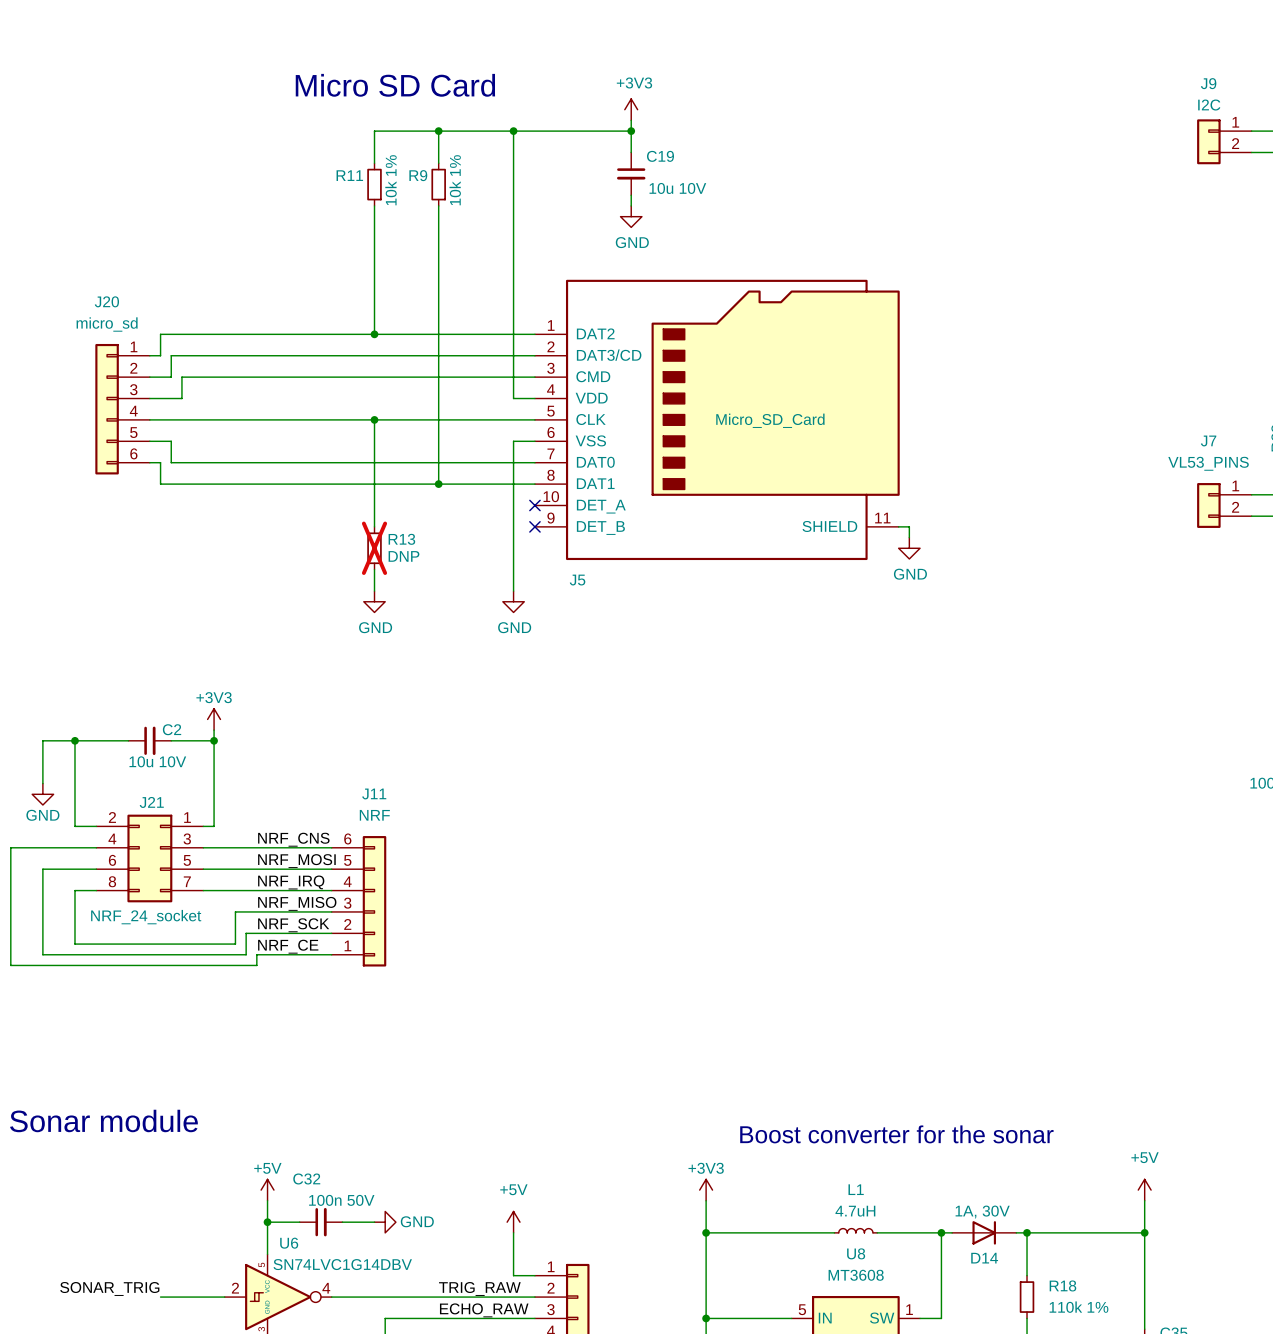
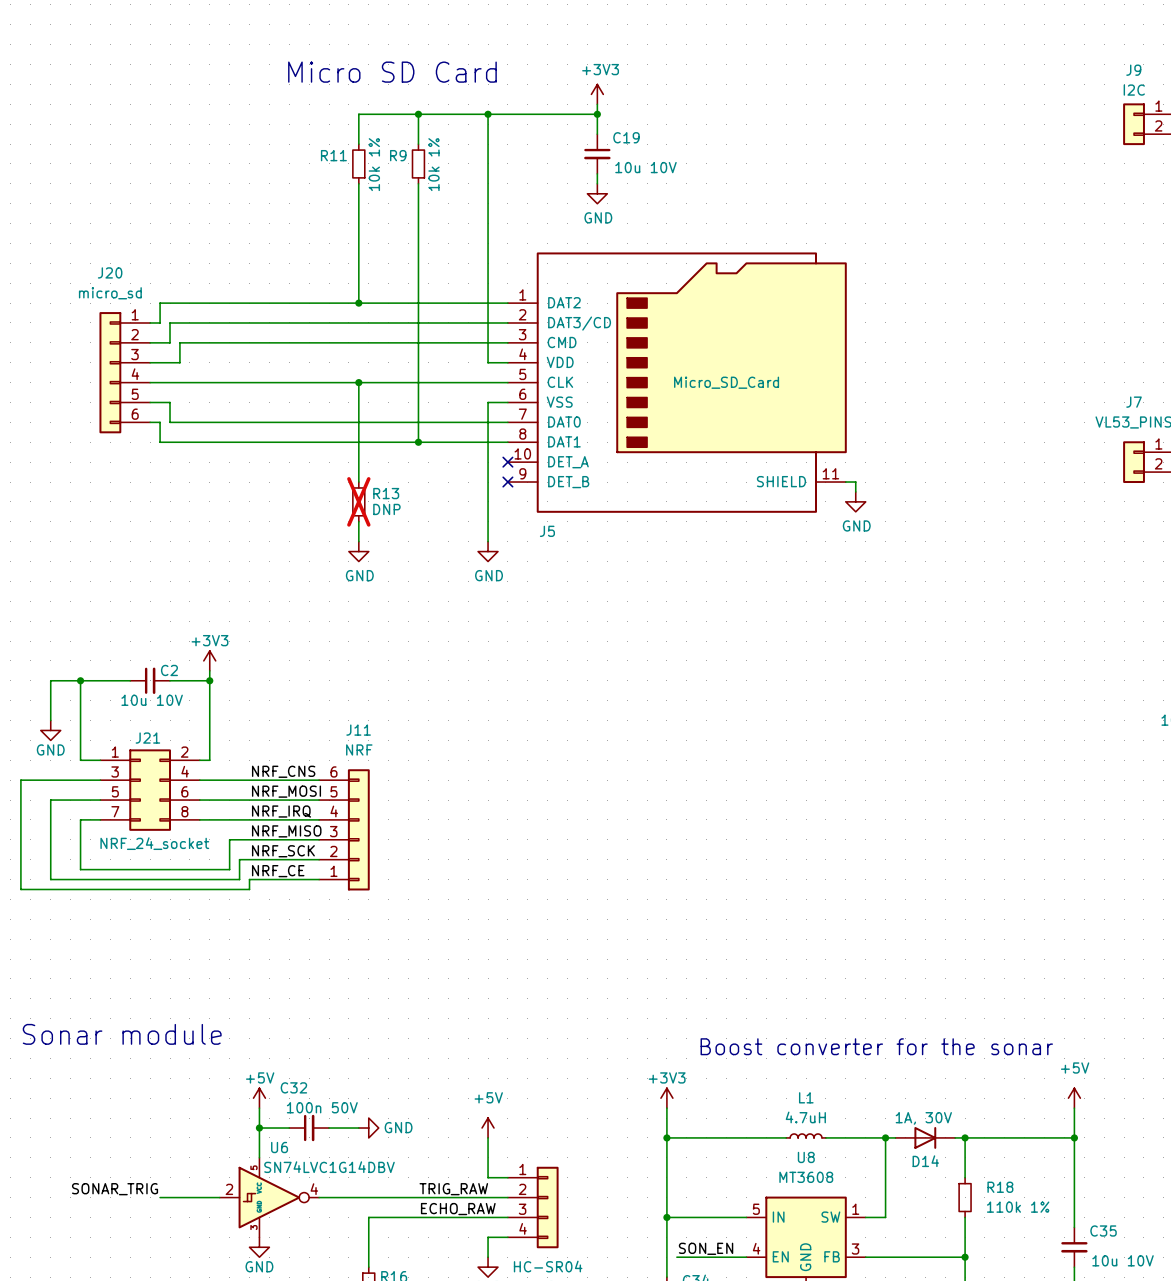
J21 flip: as is (149, 858) -> left-right (150, 790)

